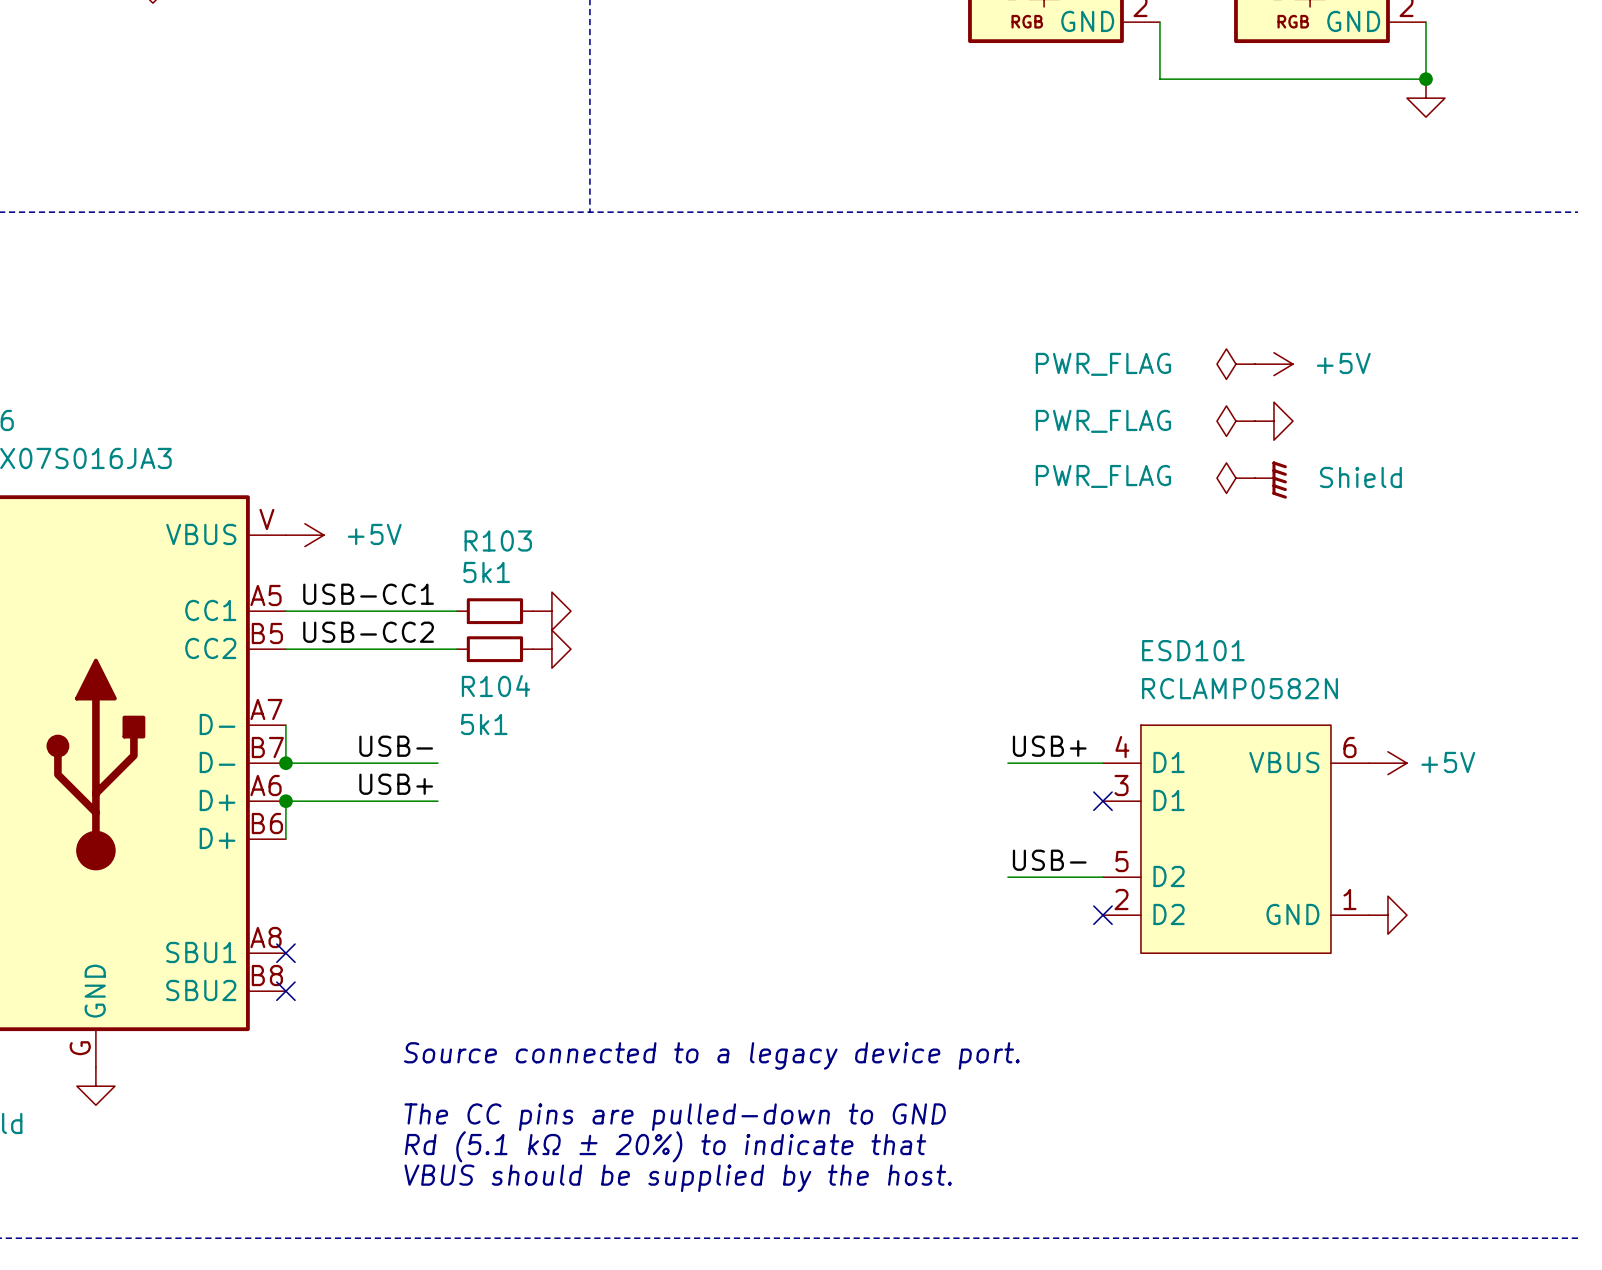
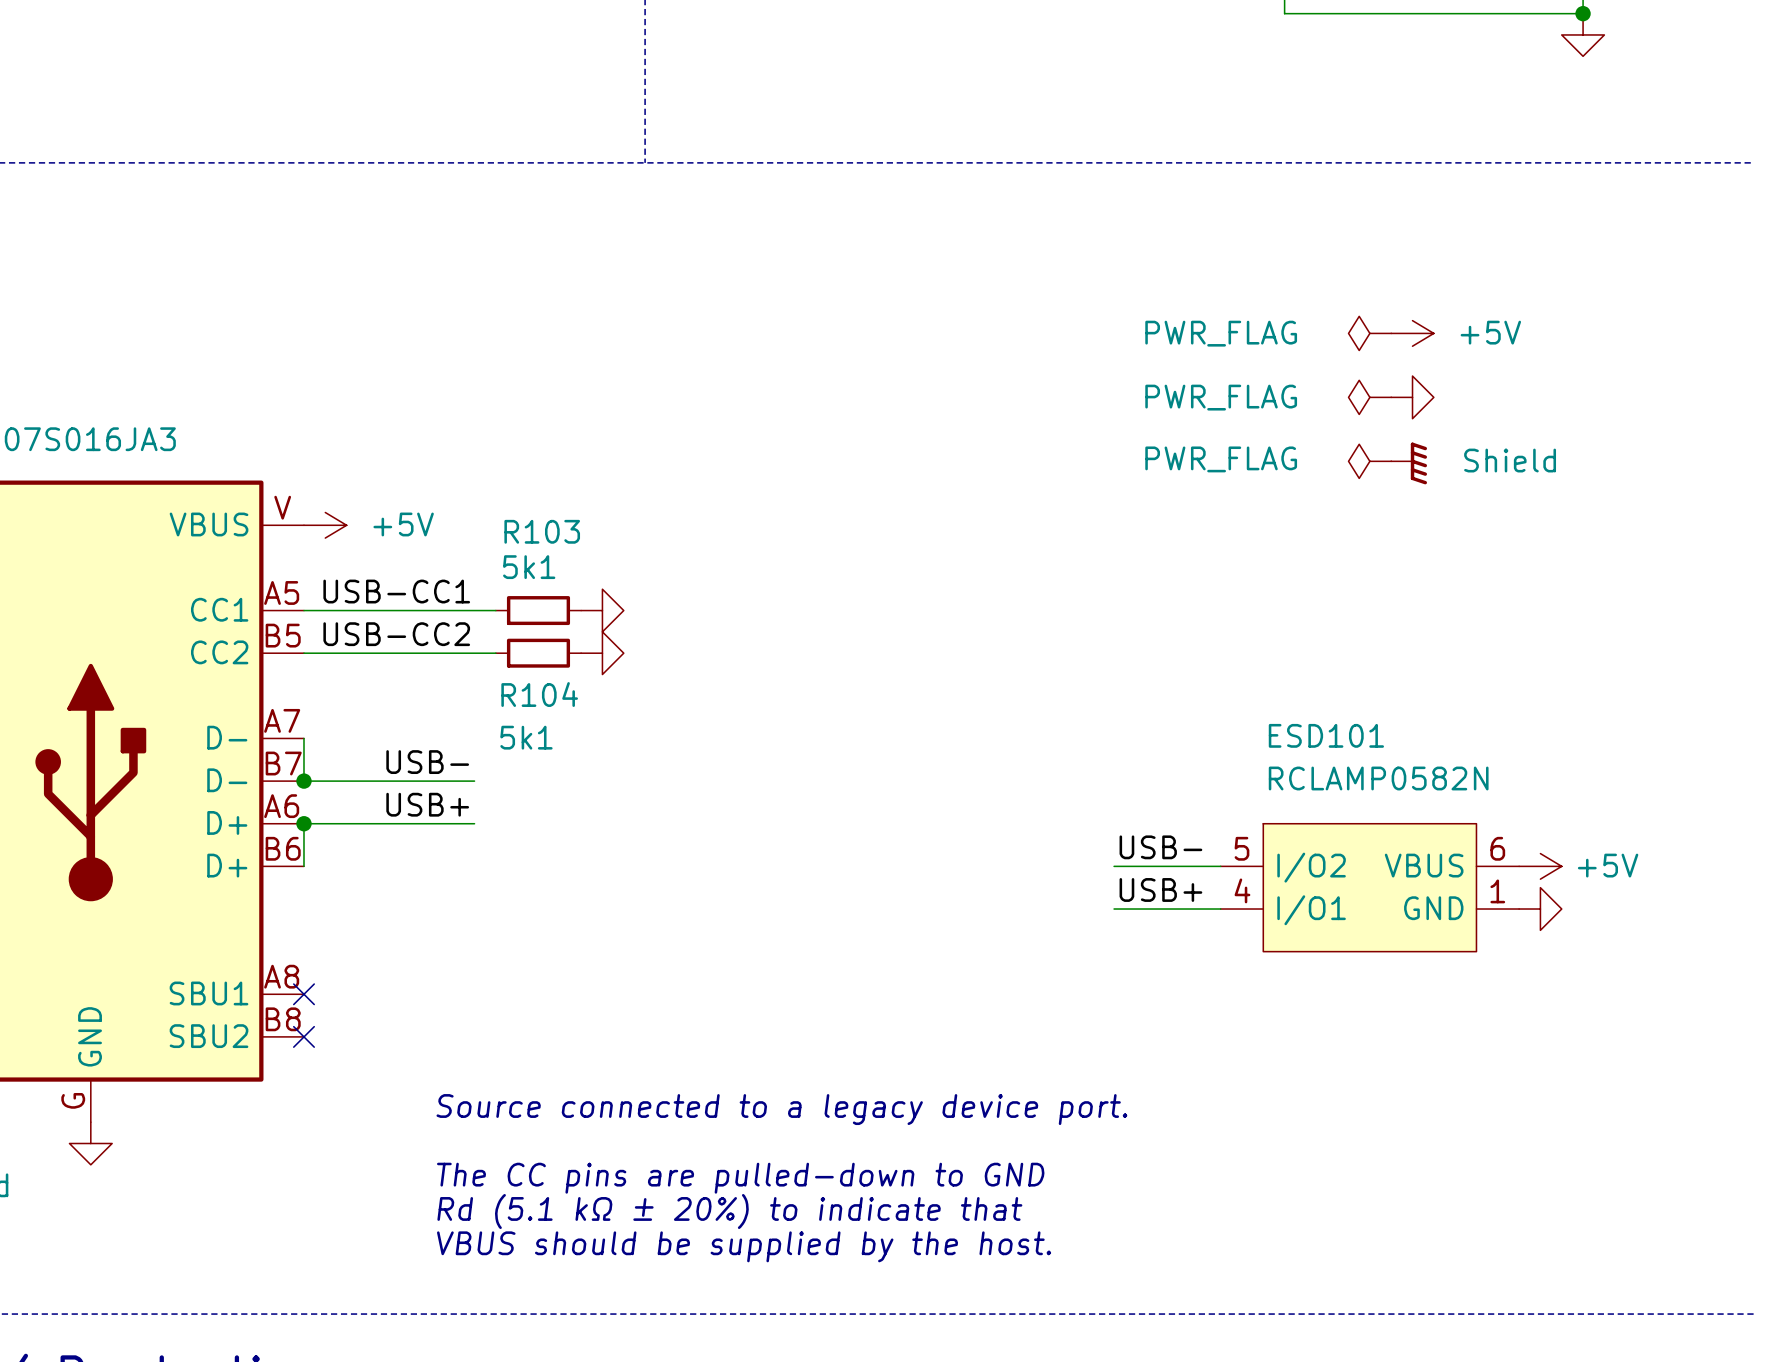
ESD101 name position: ESD101 (1193, 650) -> ESD101 (1326, 735)
ESD101 value position: RCLAMP0582N (1240, 688) -> RCLAMP0582N (1378, 778)
ESD101 symbol: [1102, 725, 1369, 954] -> [1220, 823, 1520, 952]
label: USB+ (1049, 746) -> none
wire: (1007, 763) (1102, 763) -> (1114, 866) (1220, 866)
power symbol position: +5V (1387, 763) -> +5V (1540, 866)
no-connect mark: (1102, 801) -> none
label: none -> USB- (1160, 847)
label: USB- (1049, 860) -> USB+ (1160, 889)
no-connect mark: (1102, 915) -> none
power symbol position: (1387, 915) -> (1540, 909)

